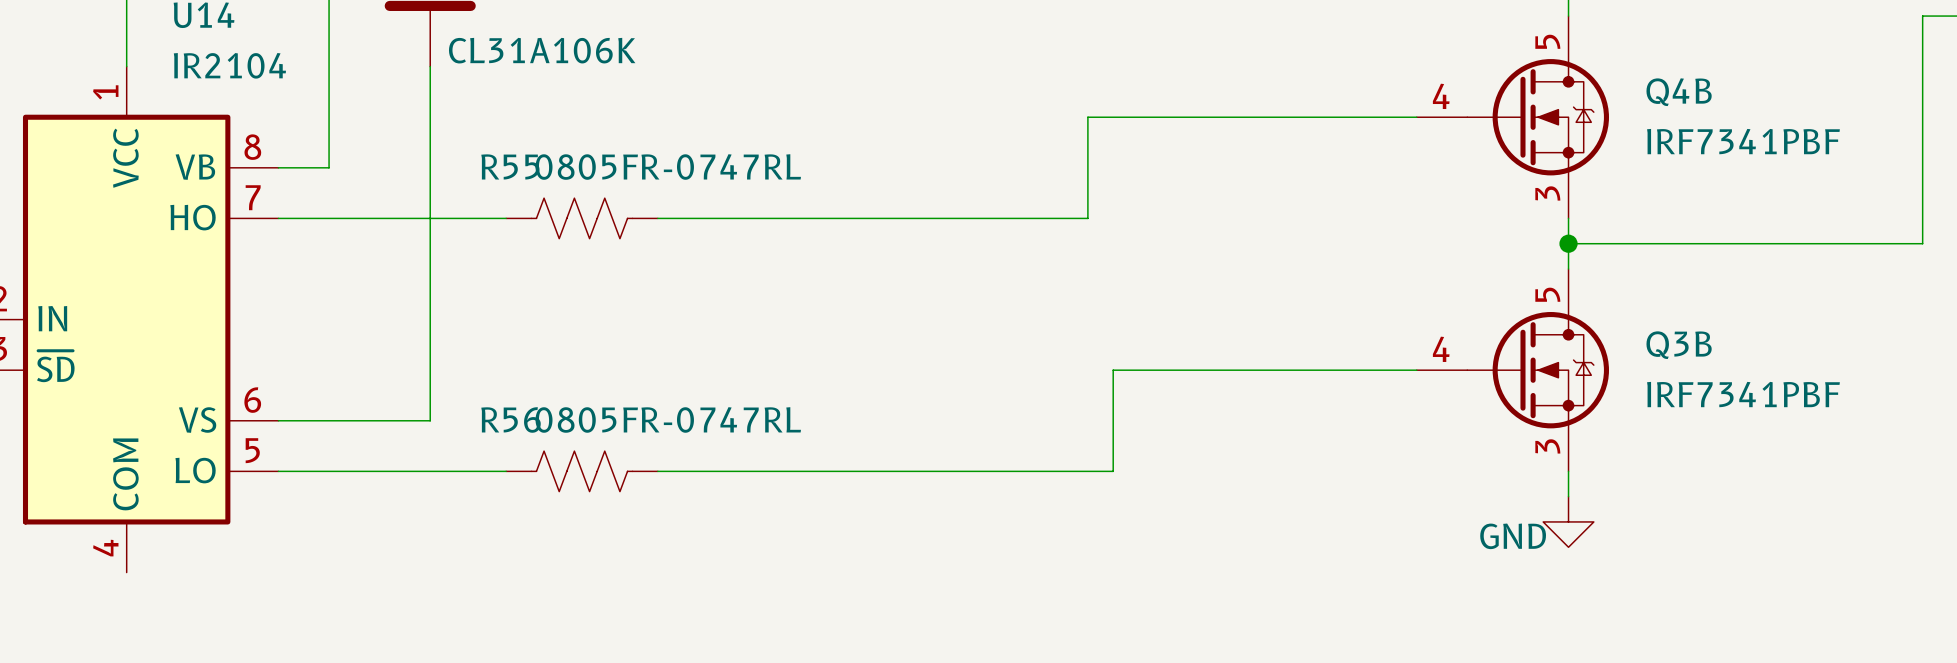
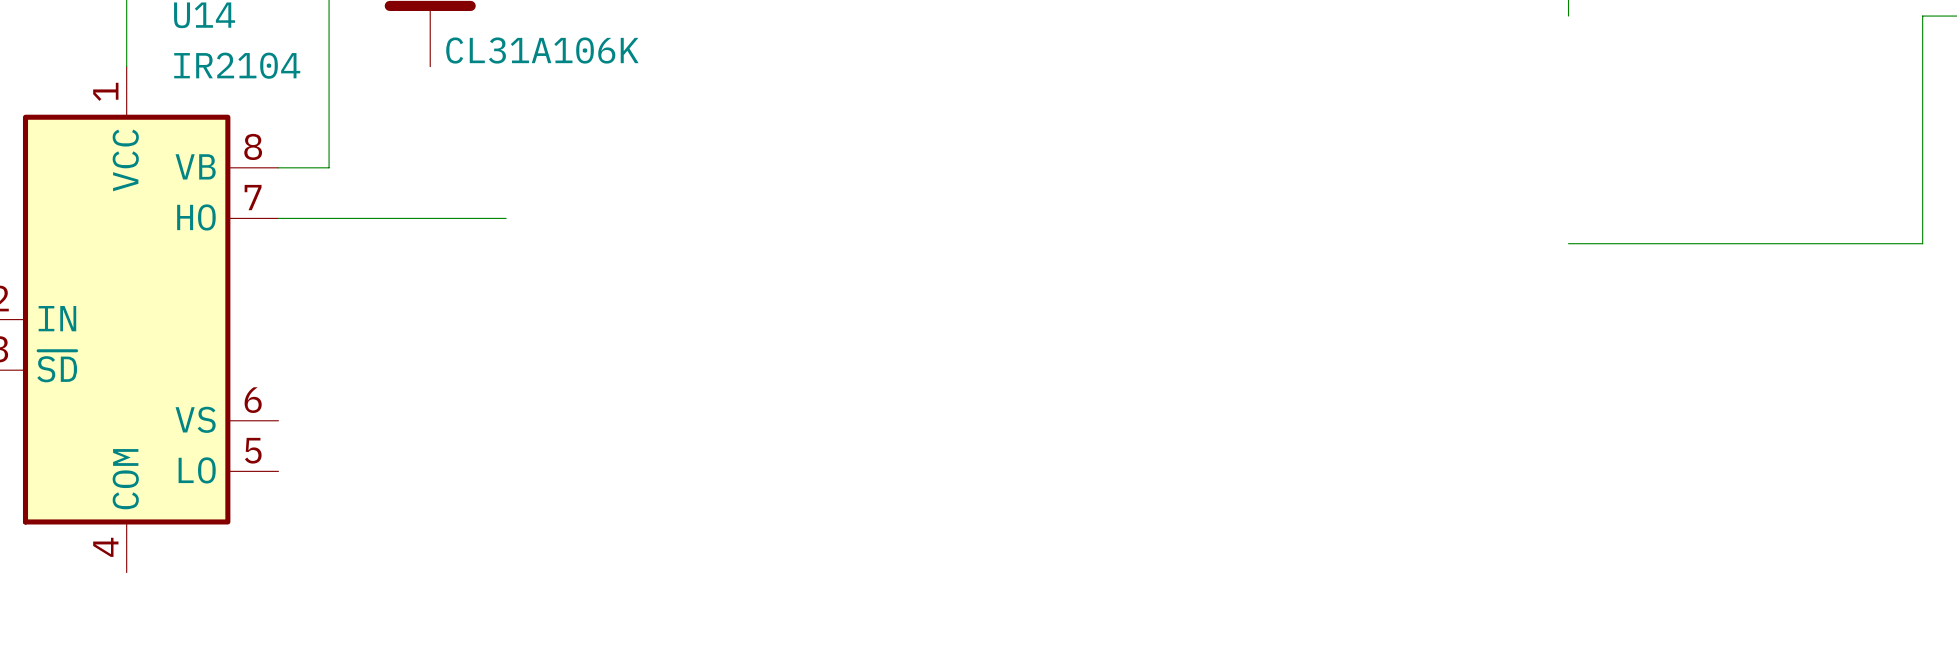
wire: (430, 66) (430, 420) (278, 420) -> none
wire: (1416, 117) (1087, 117) (1087, 218) (657, 218) -> none
Q4B: IRF7341PBF (1512, 117) -> none
R55: 0805FR-0747RL (582, 218) -> none
wire: (1568, 218) (1568, 269) -> none
junction: (1568, 243) -> none
wire: (1416, 370) (1113, 370) (1113, 471) (657, 471) -> none
Q3B: IRF7341PBF (1512, 370) -> none
wire: (278, 471) (506, 471) -> none
R56: 0805FR-0747RL (582, 471) -> none
wire: (1568, 471) (1568, 496) -> none
power symbol: GND (1568, 521) -> none

